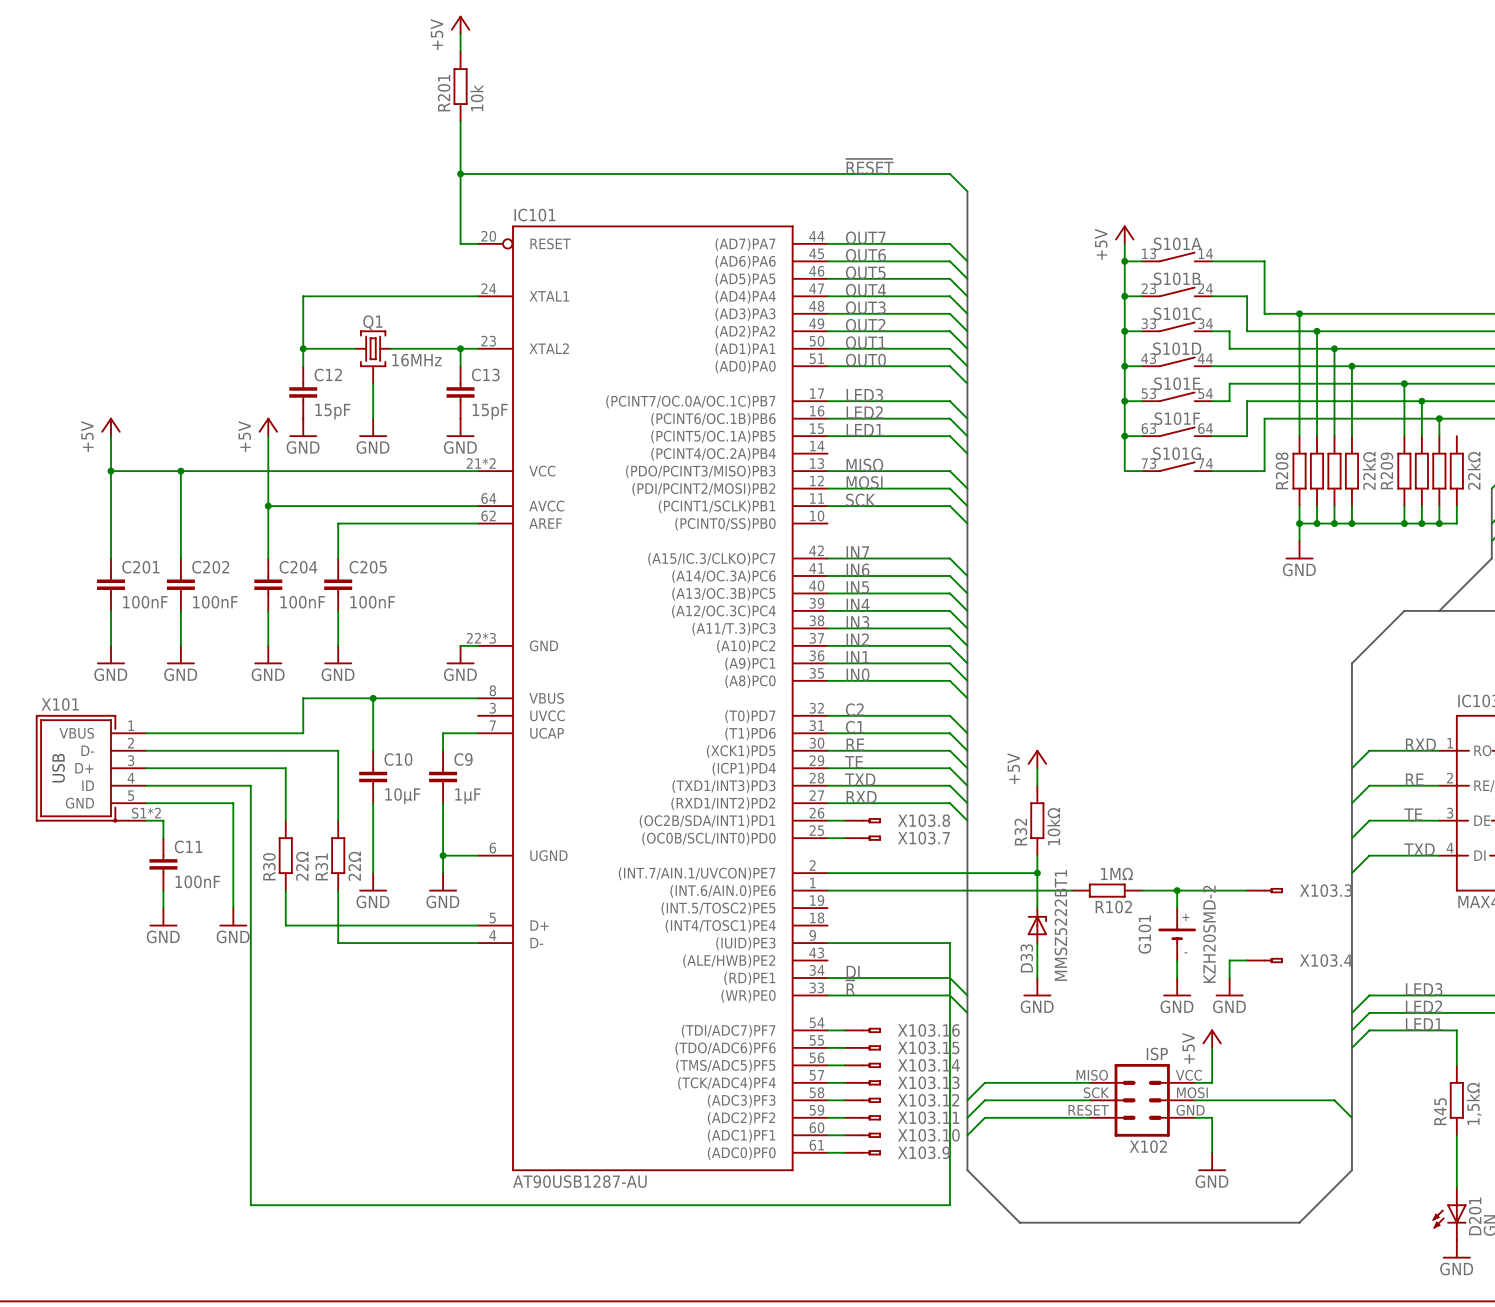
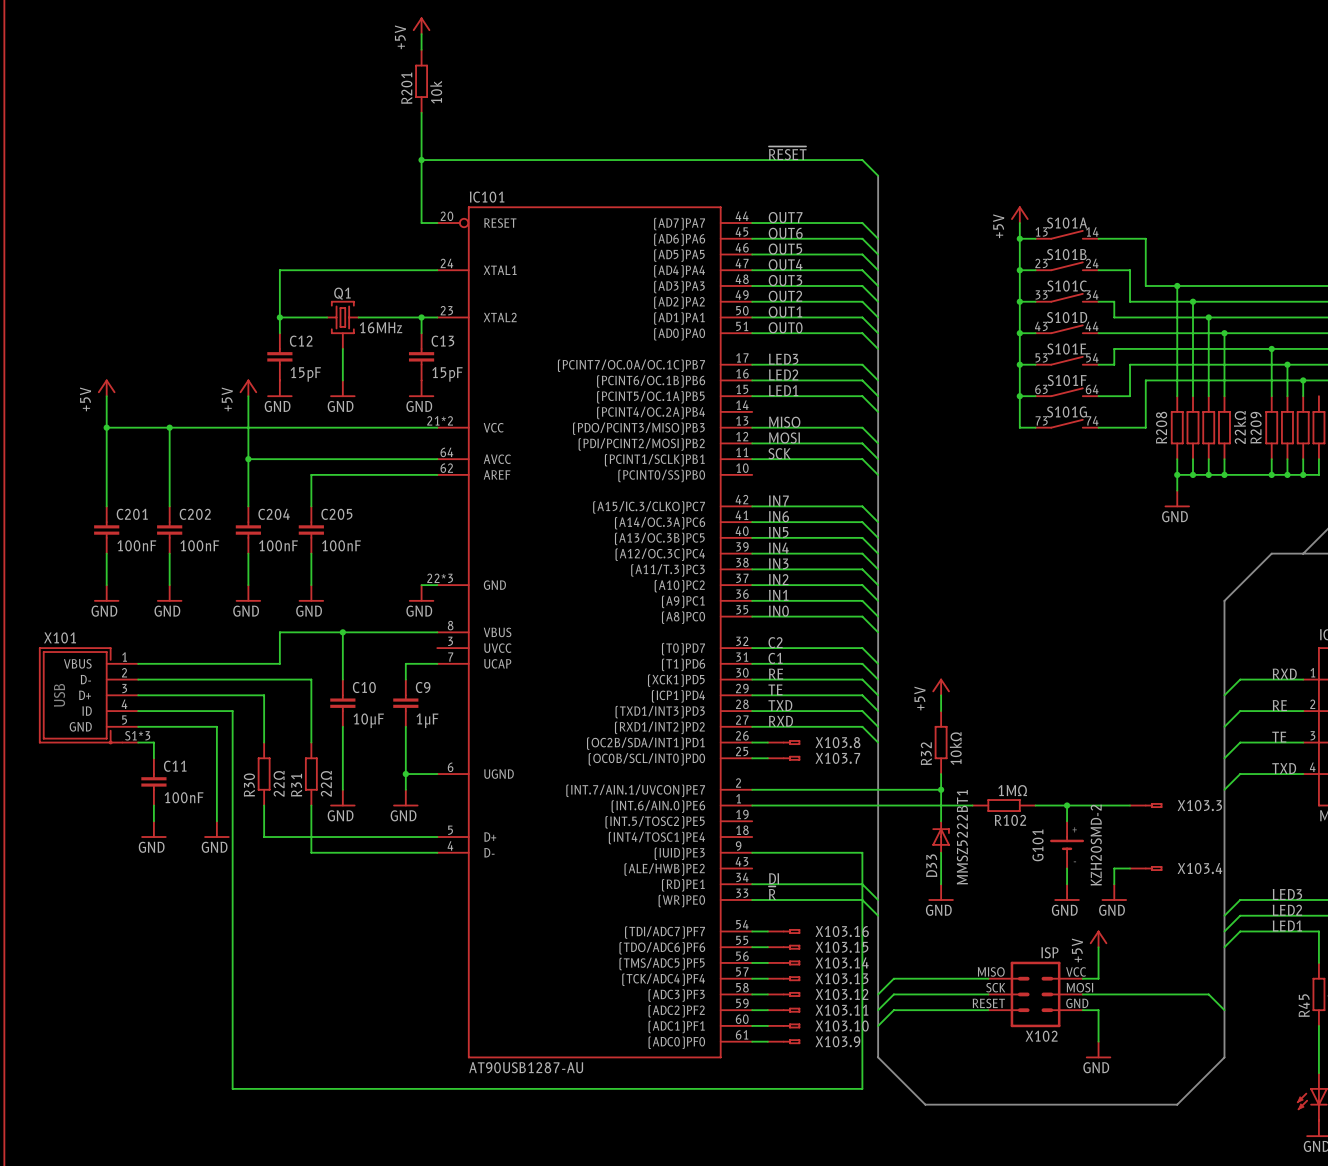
X101 pin number: S1*2 (146, 813) -> S1*3 (137, 735)

